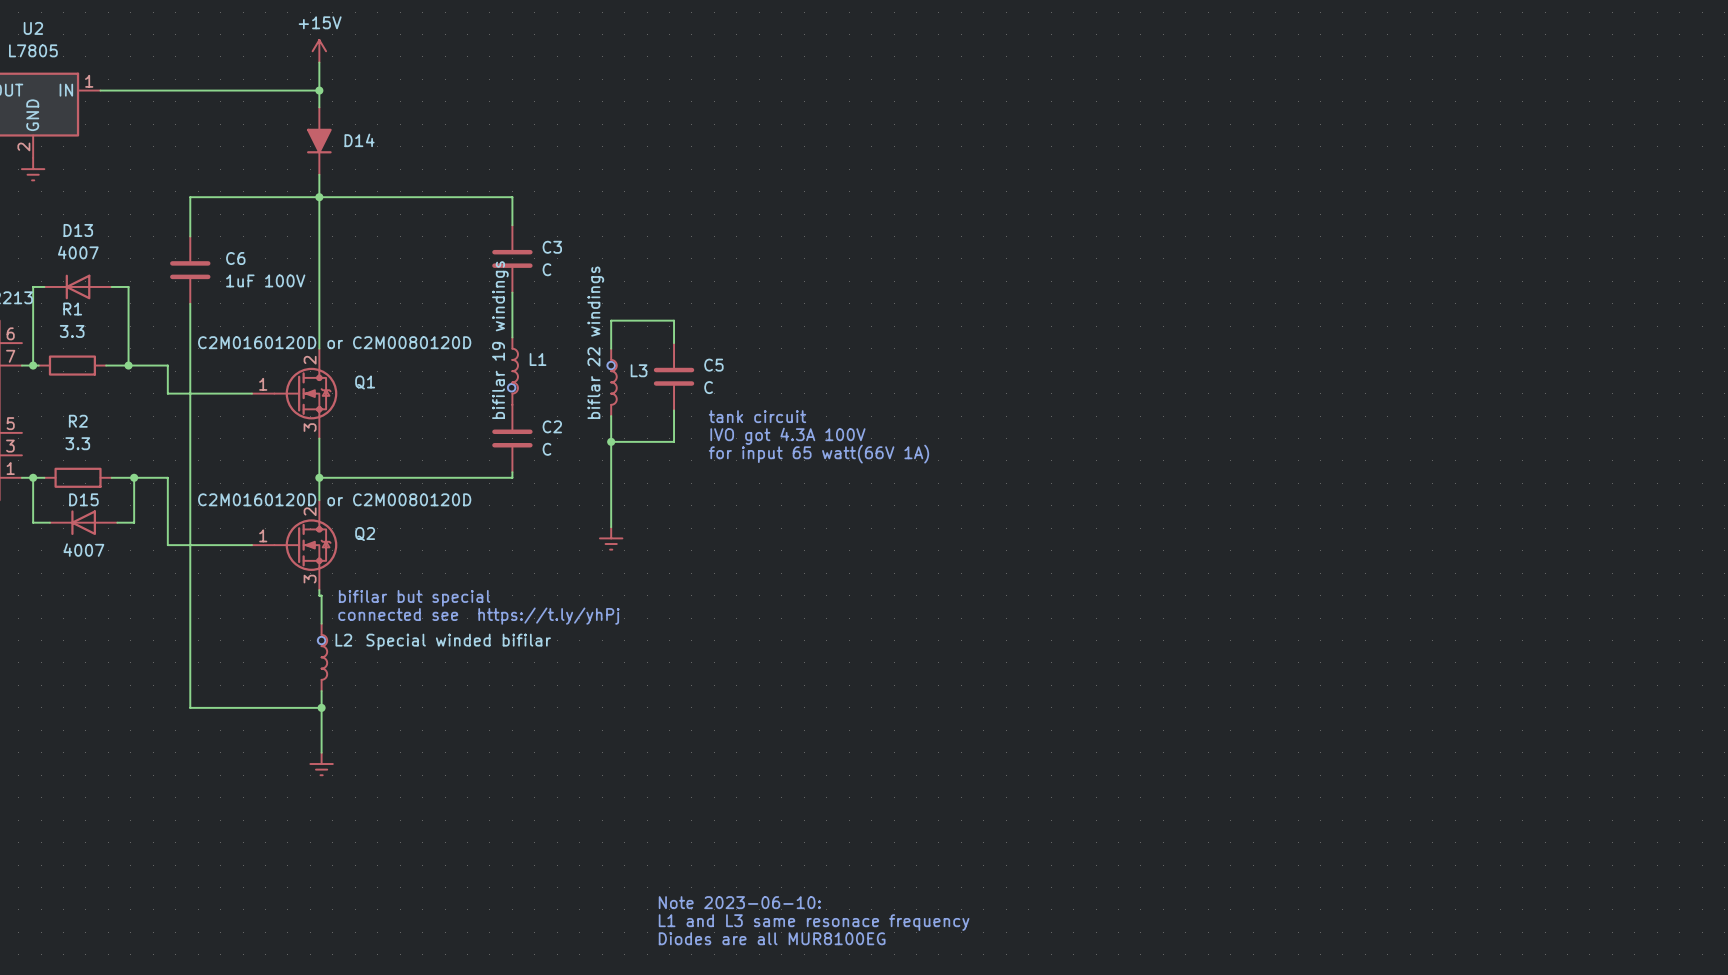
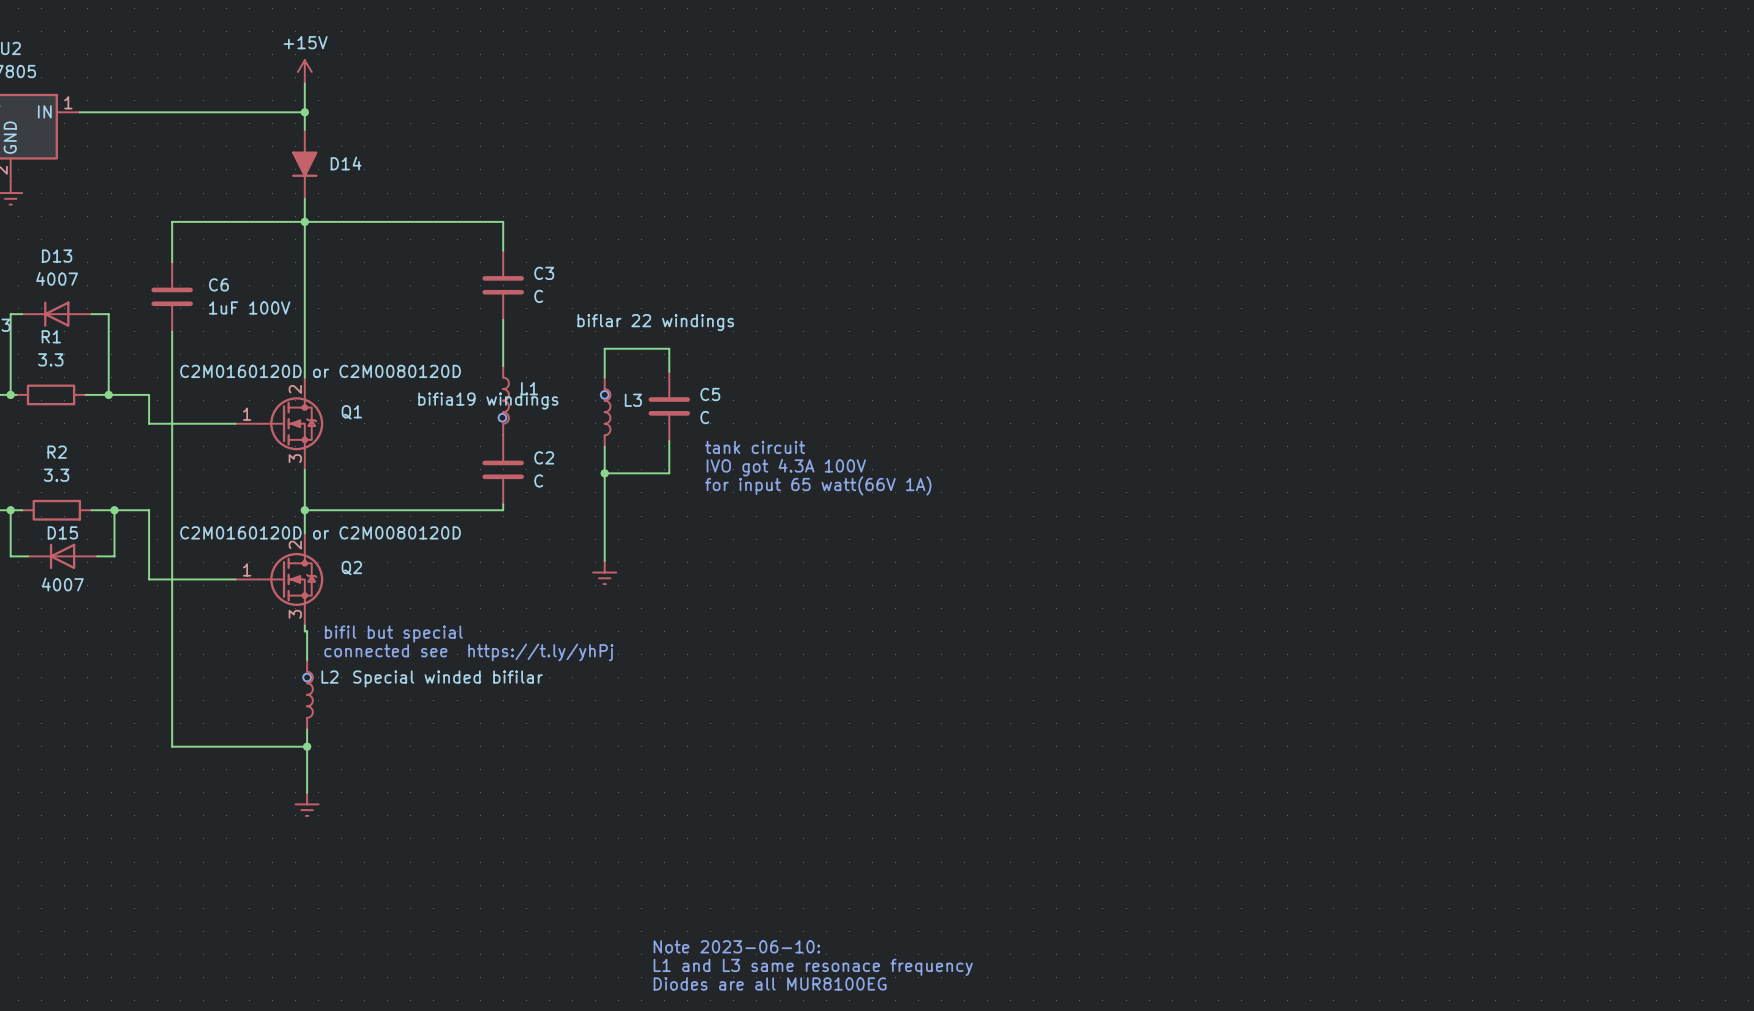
L1 value: bifilar 19 windings (500, 340) -> bifia19 windings (488, 401)
L3 value rotation: 0° (595, 342) -> 90° clockwise (655, 322)
text: bifilar but special (414, 598) -> bifil but special (393, 634)

